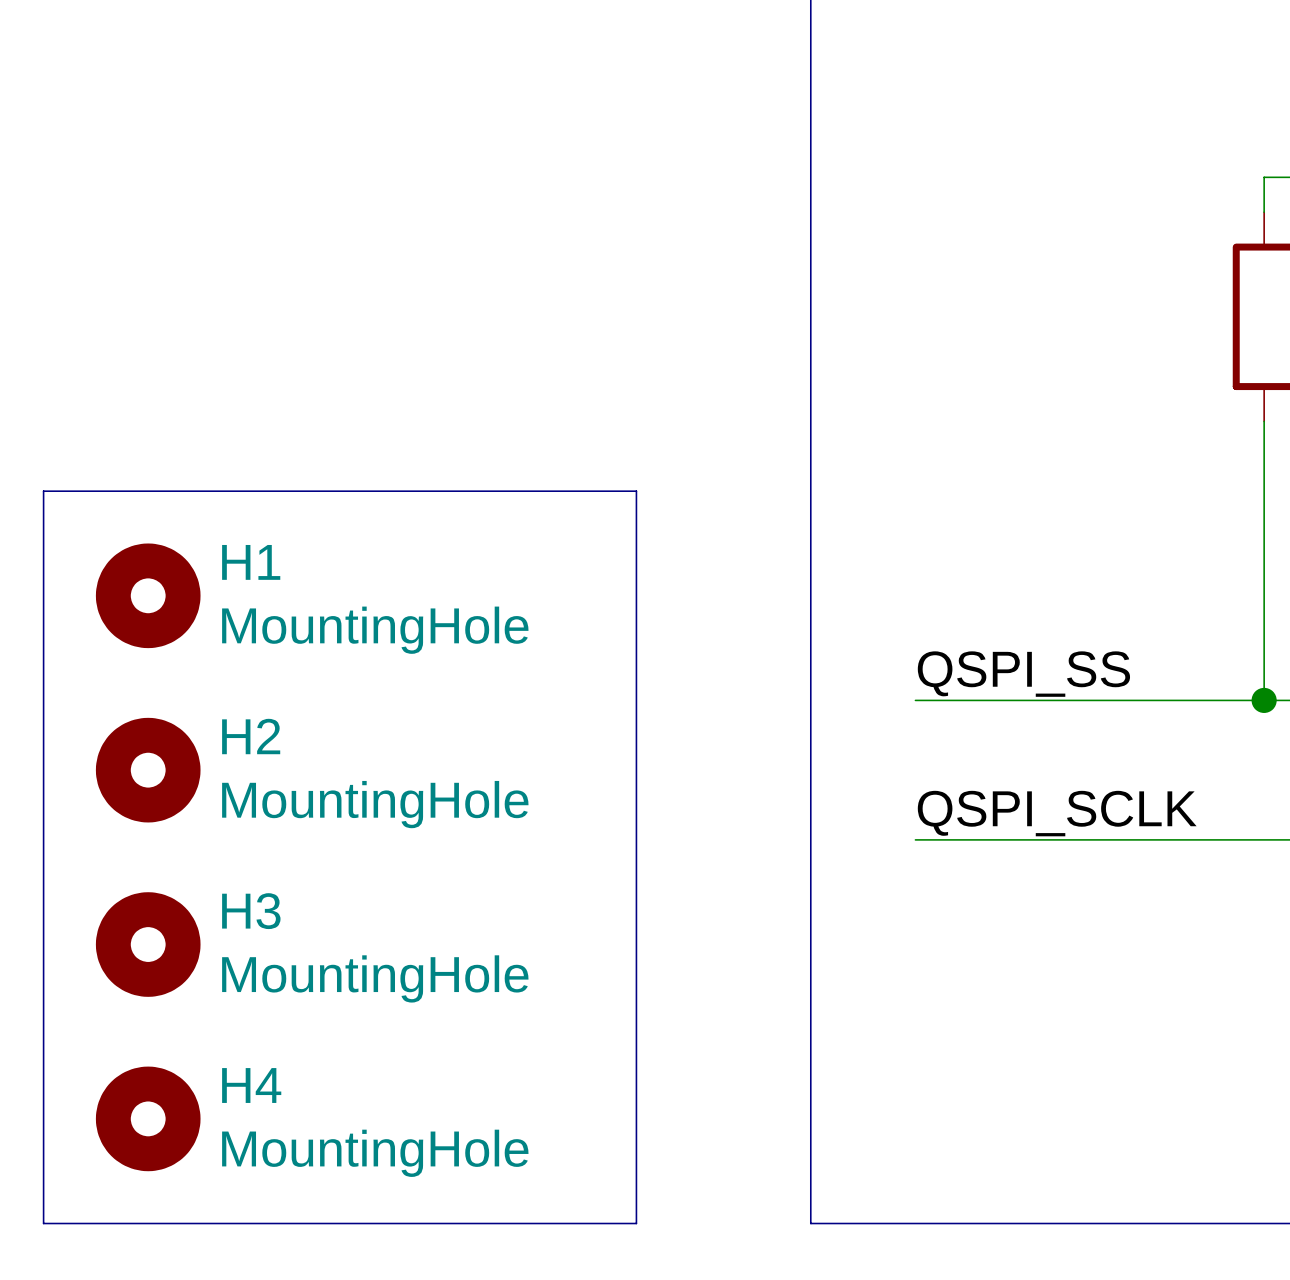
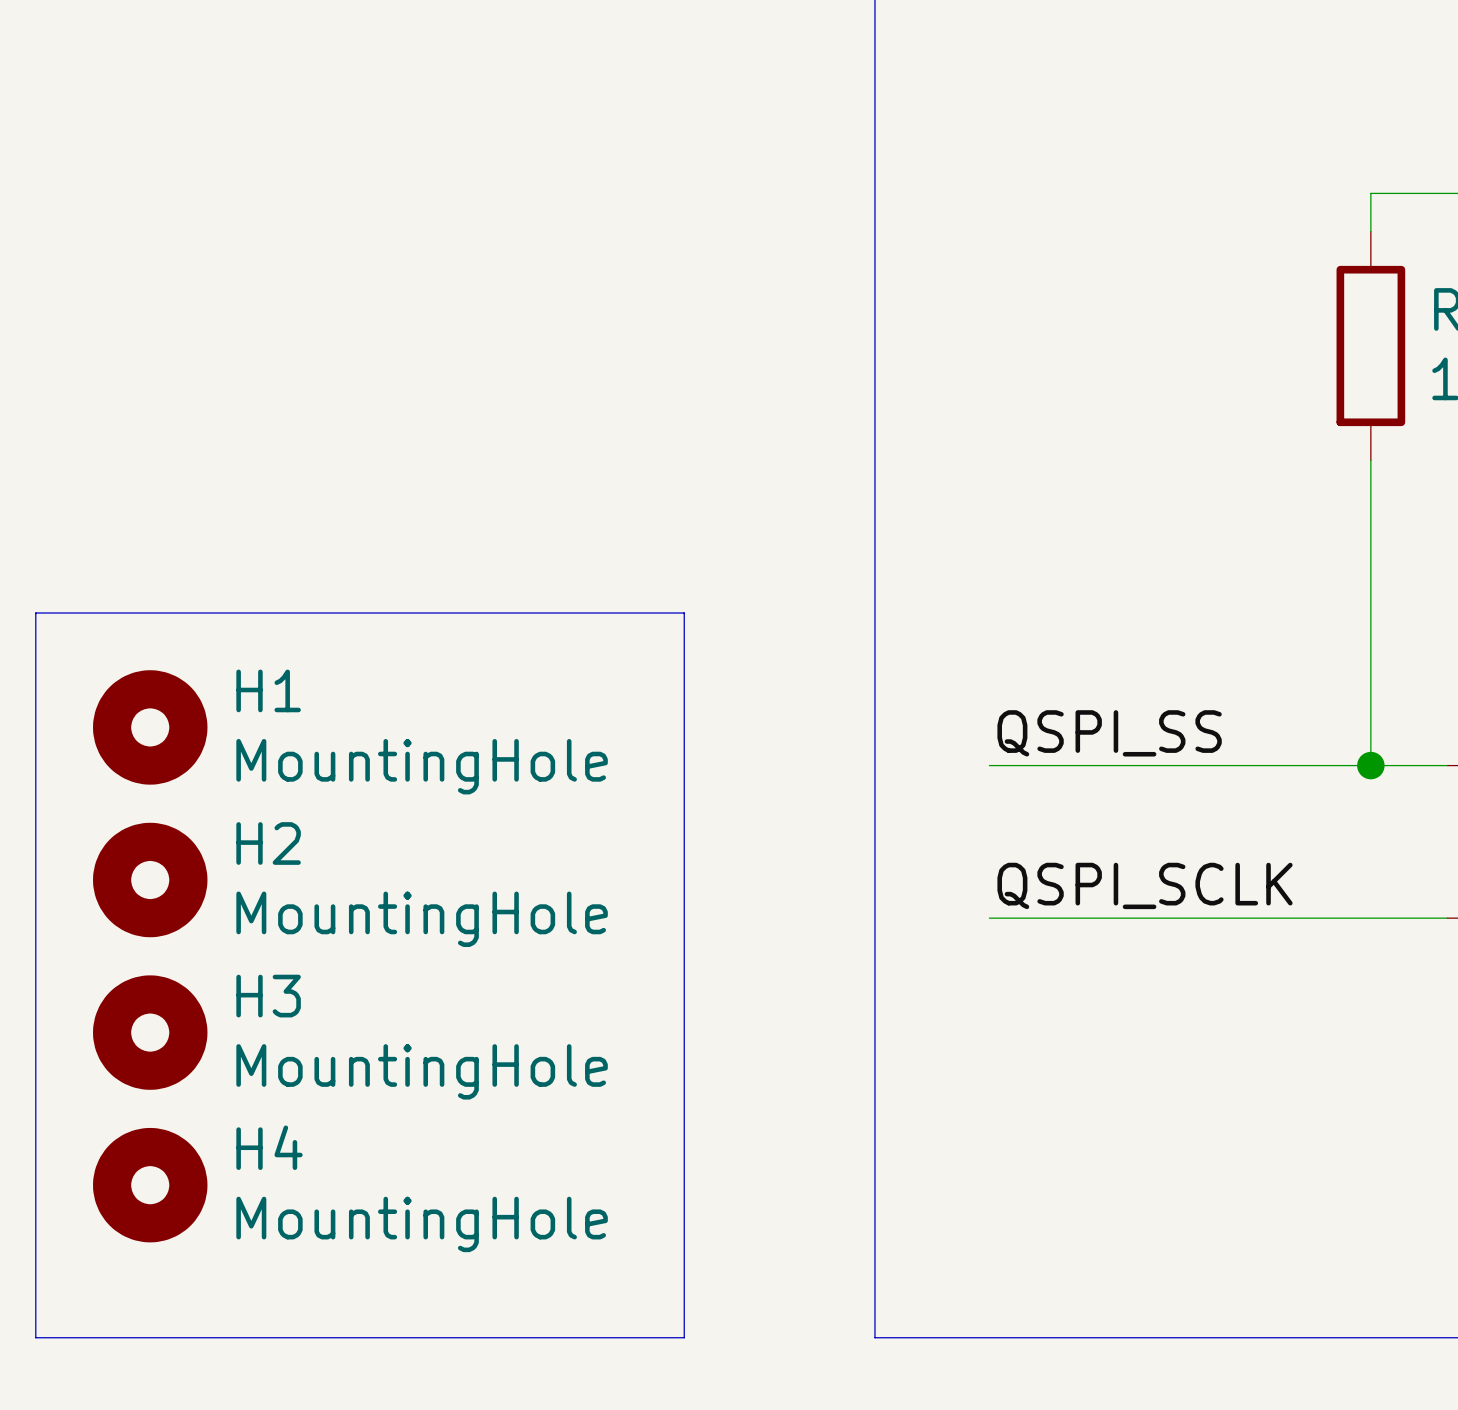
line: (43, 560) (43, 491) (636, 491) (636, 560) -> (35, 613) (684, 613)
H1 position: (148, 595) -> (150, 727)
H2 position: (148, 770) -> (150, 880)
H4 position: (148, 1118) -> (150, 1185)

